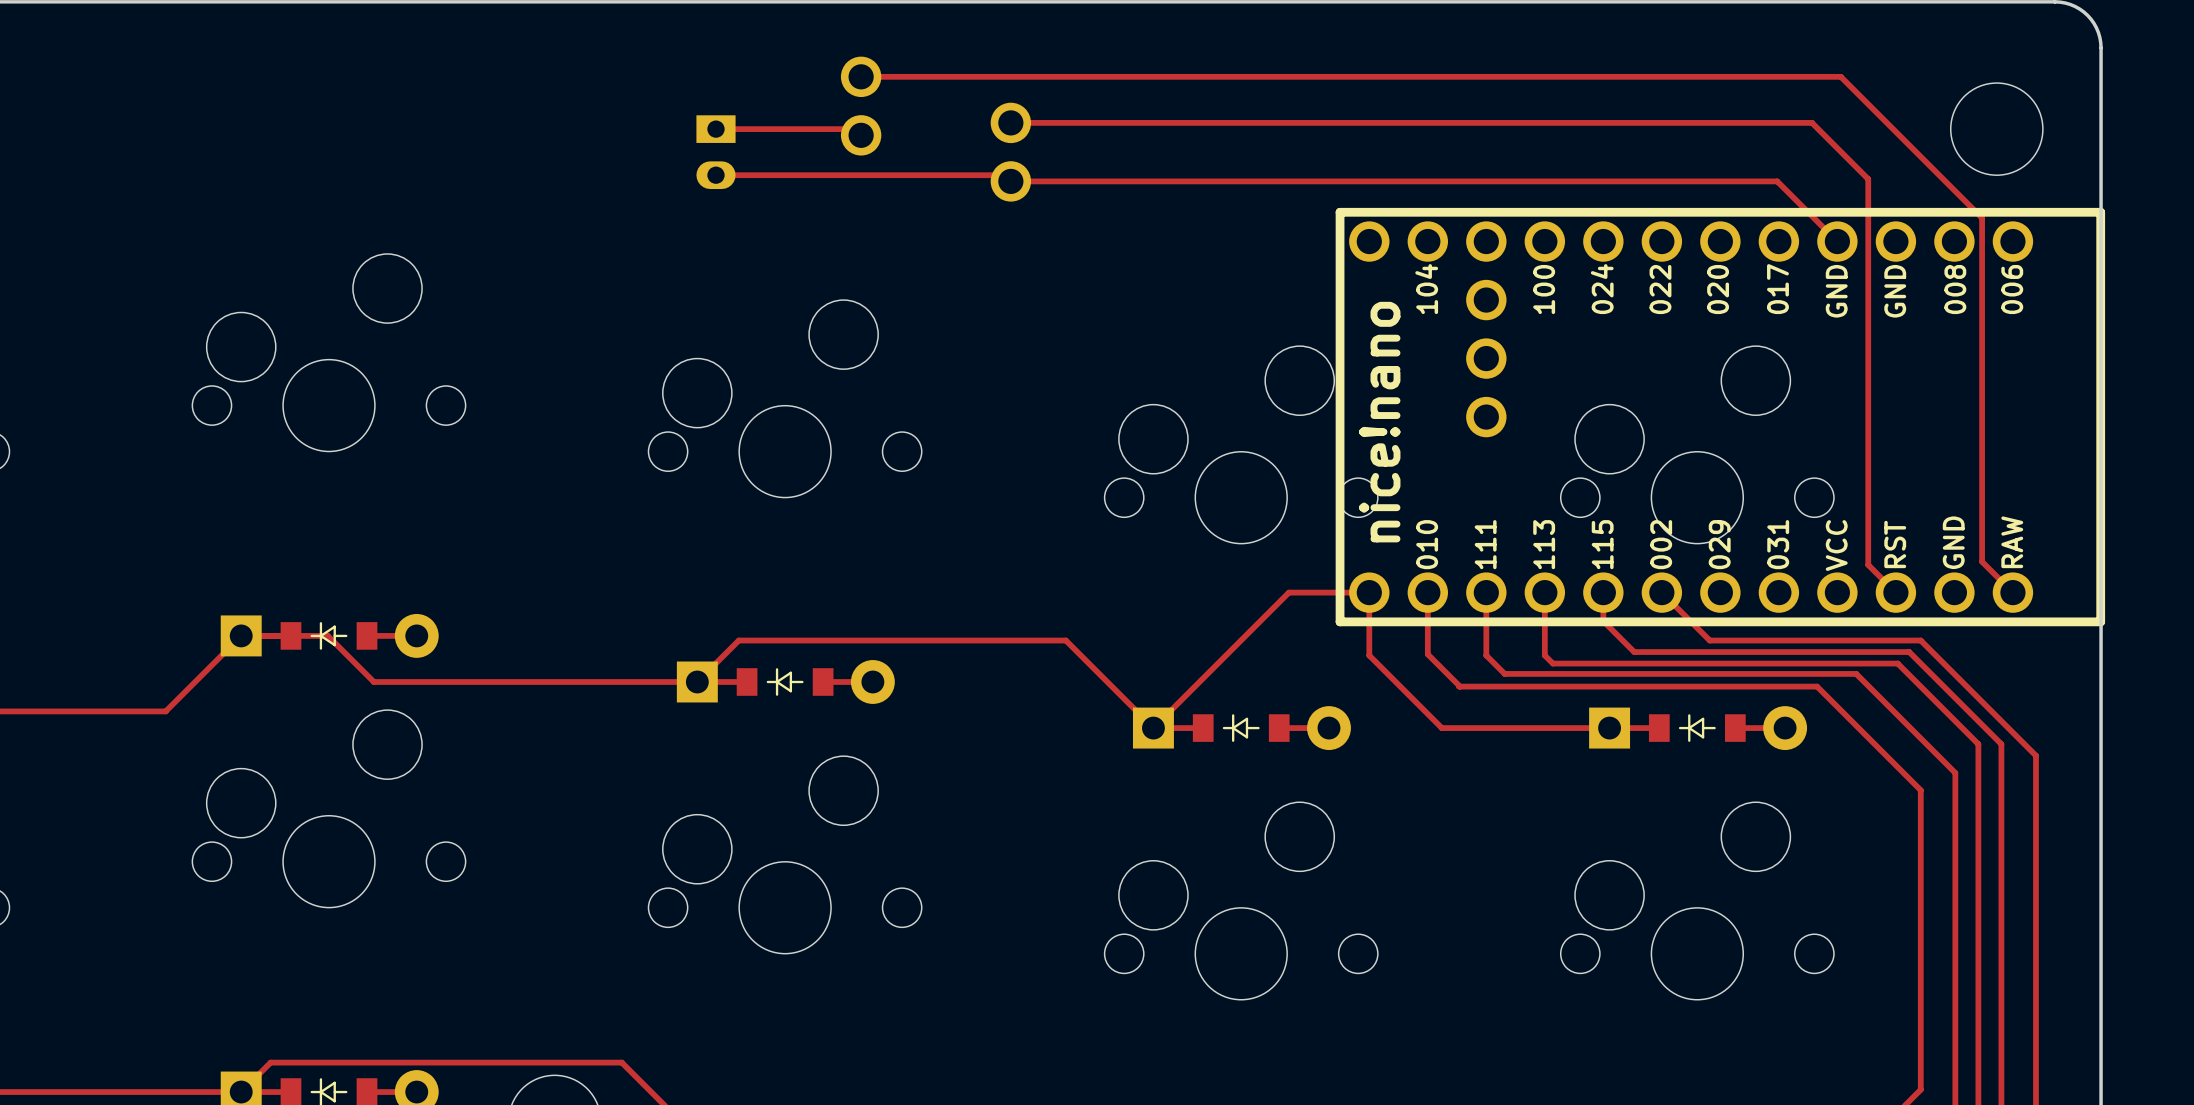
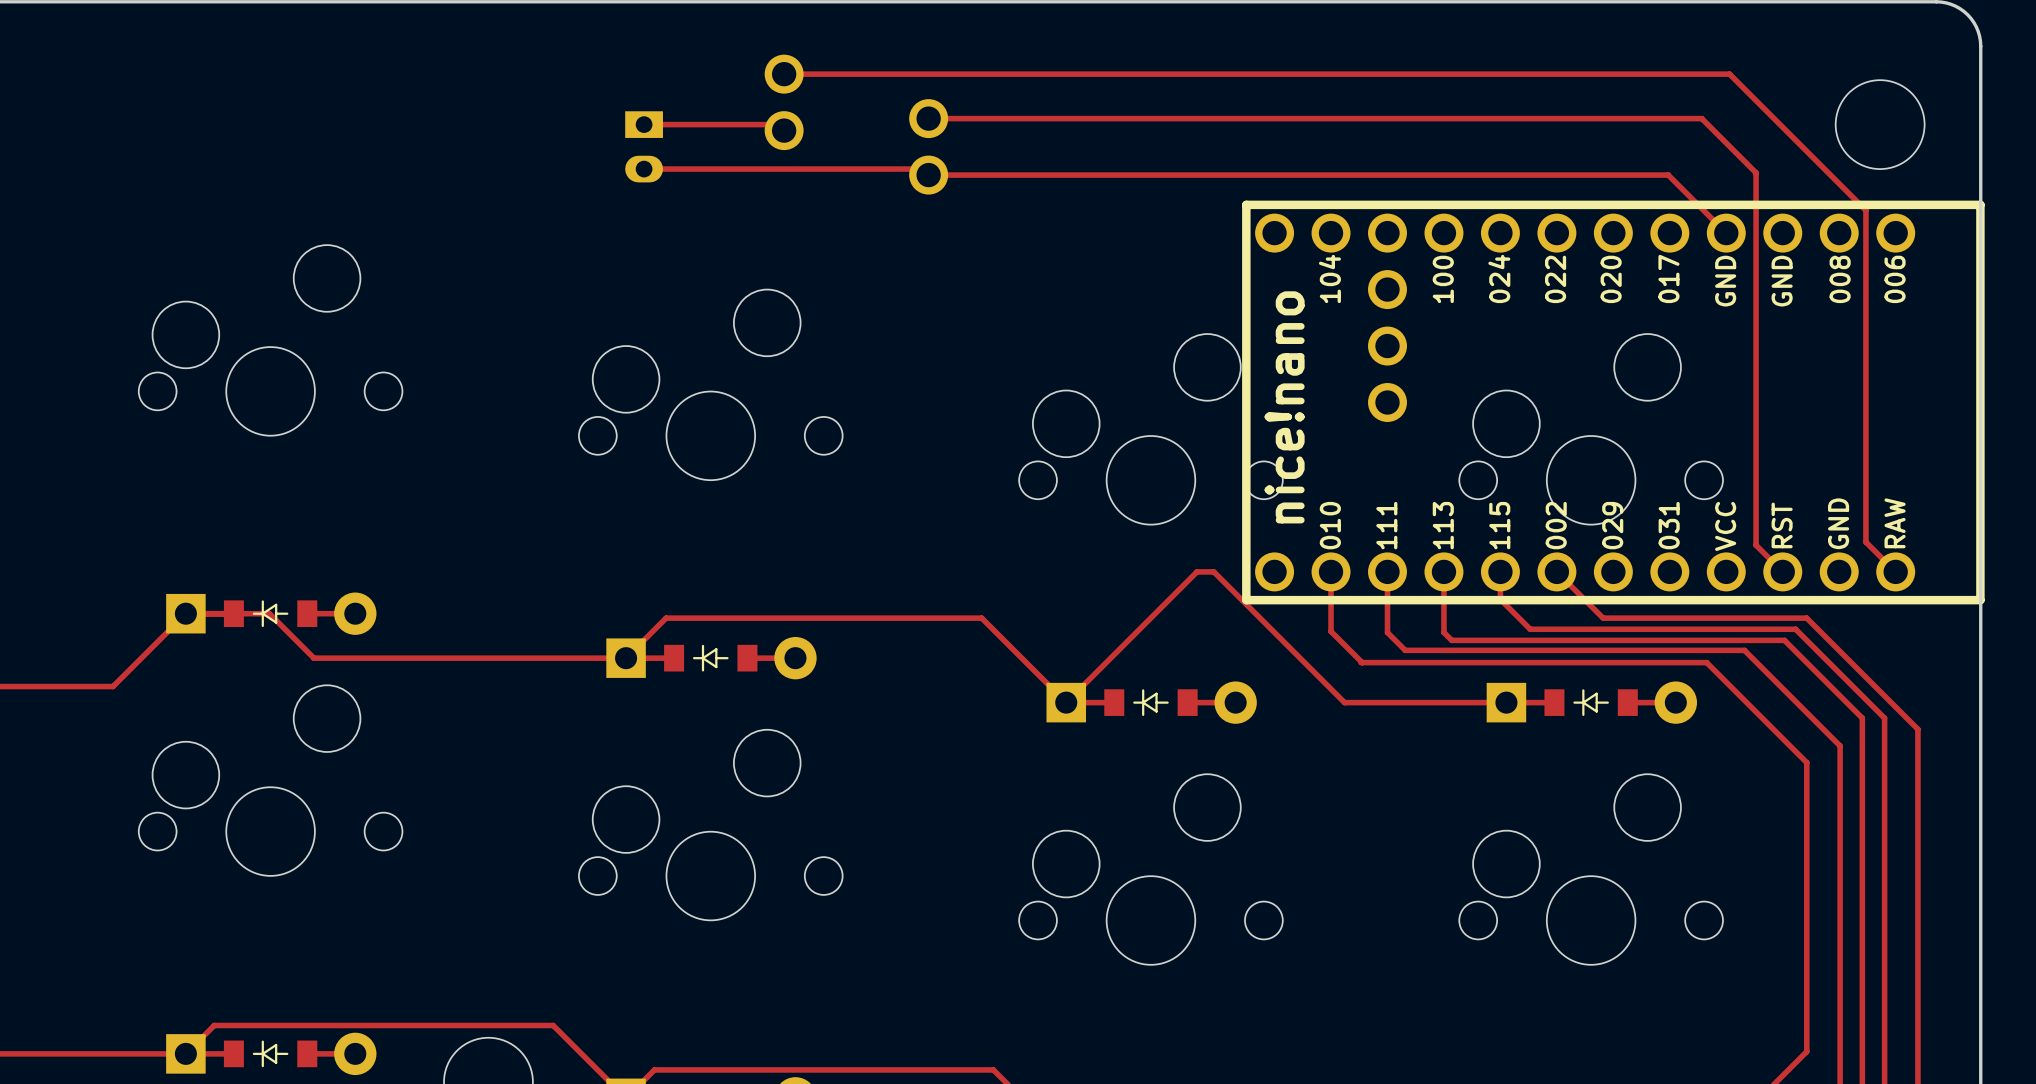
track: (1306, 592) (1369, 592) (1369, 655) -> (1213, 571) (1274, 632)

